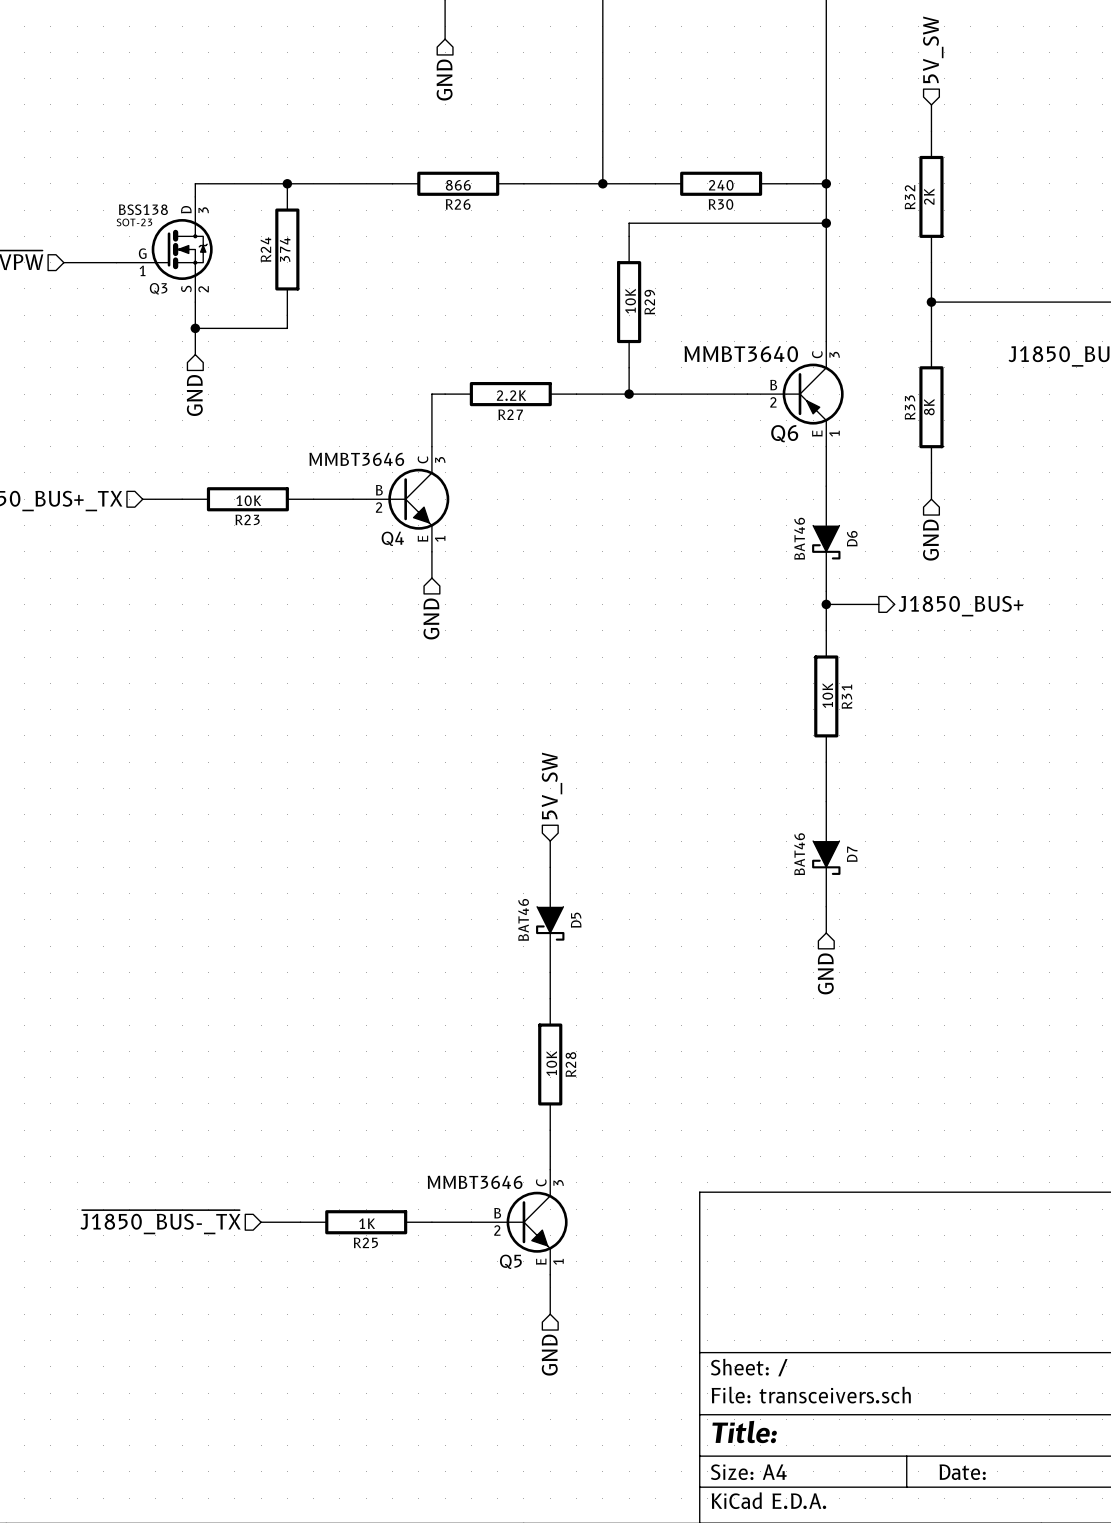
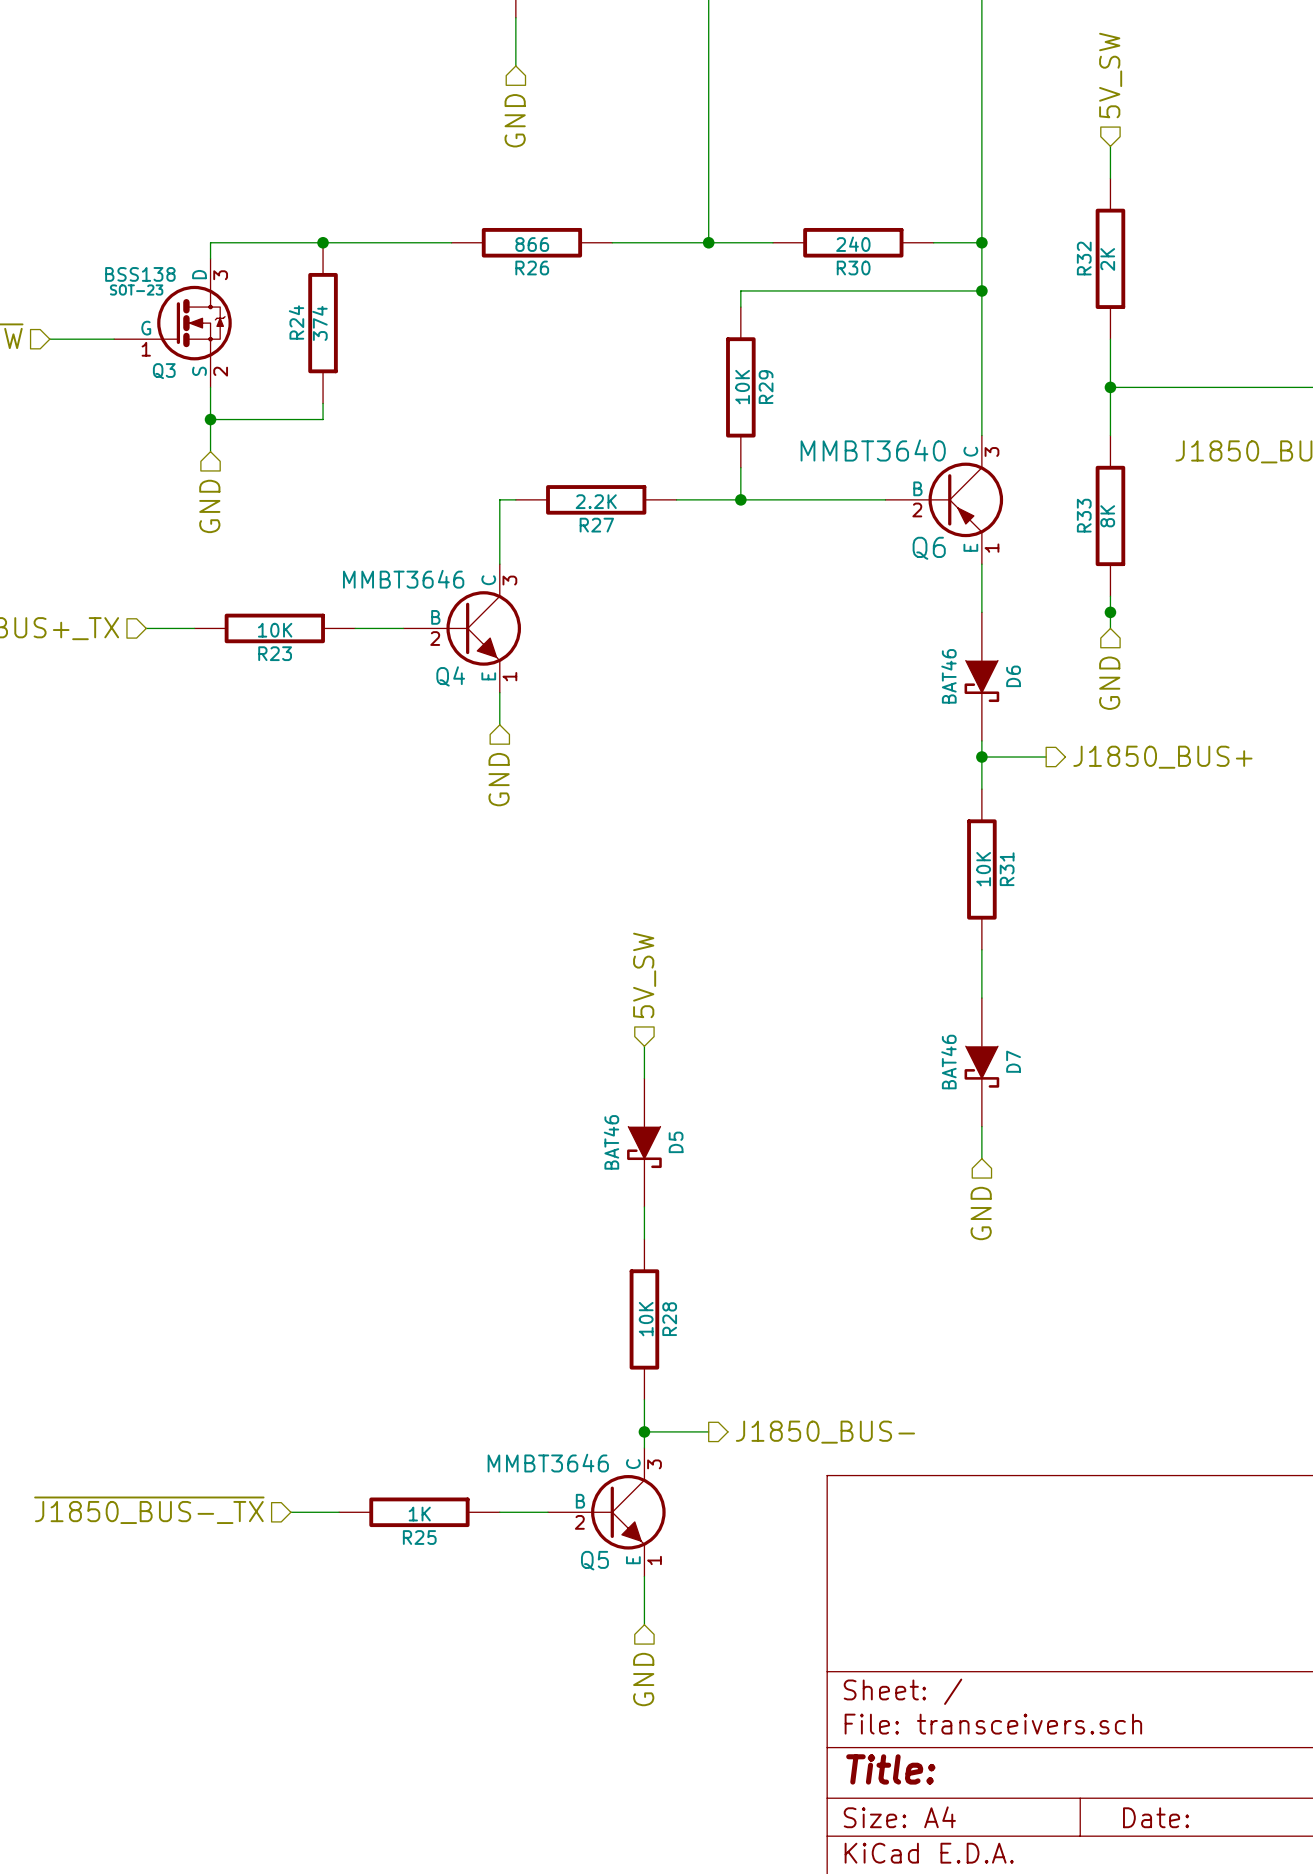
junction: none -> (1110, 612)
wire: none -> (644, 1431) (708, 1431)
junction: none -> (644, 1431)
hierarchical label: none -> J1850_BUS- (825, 1432)

